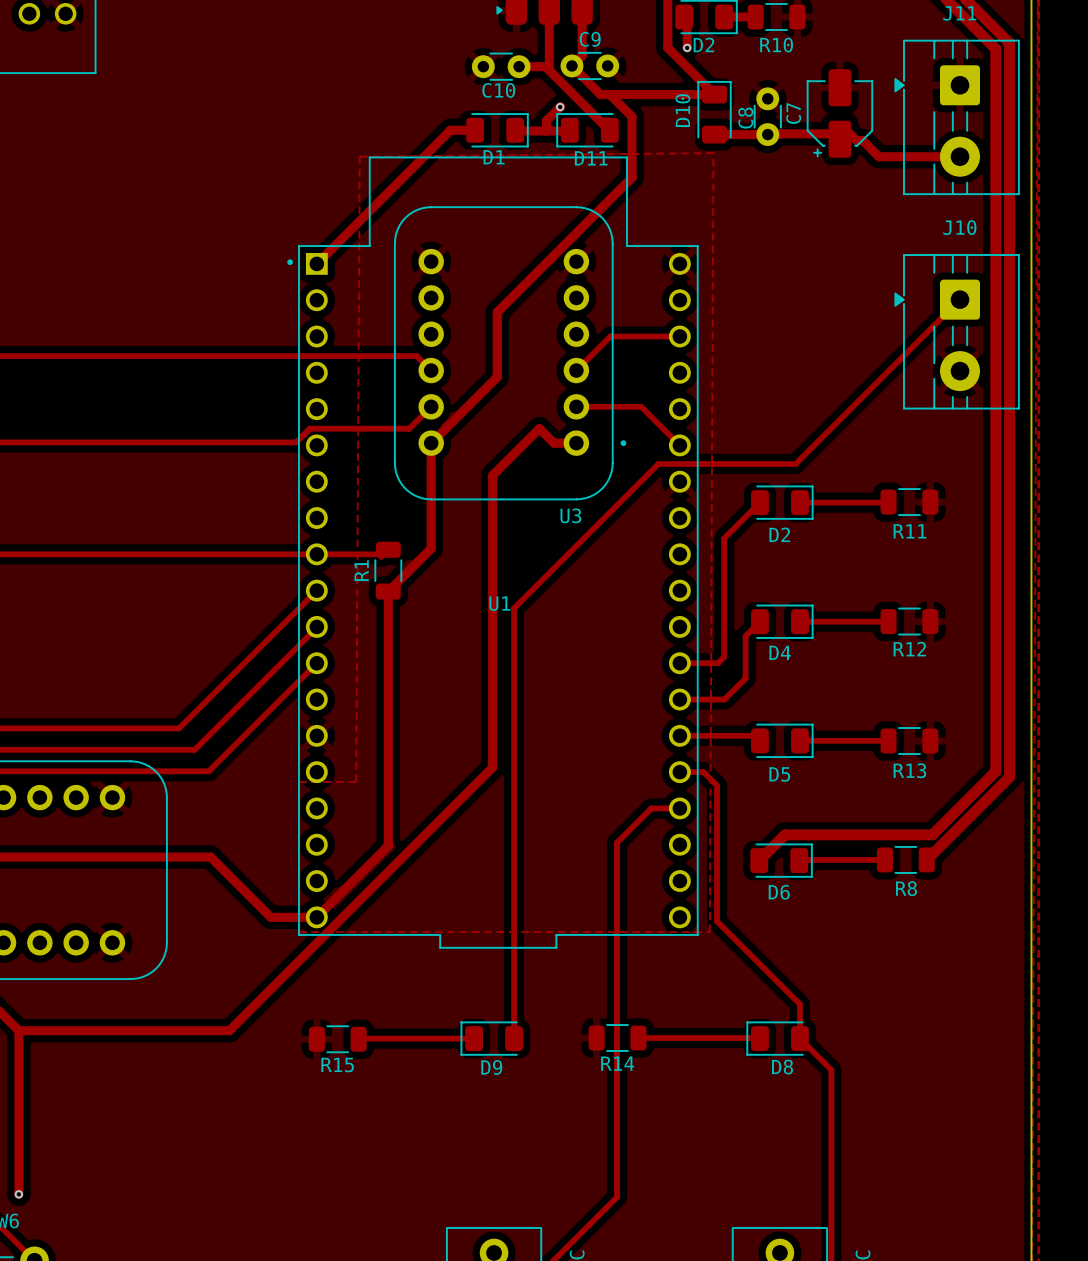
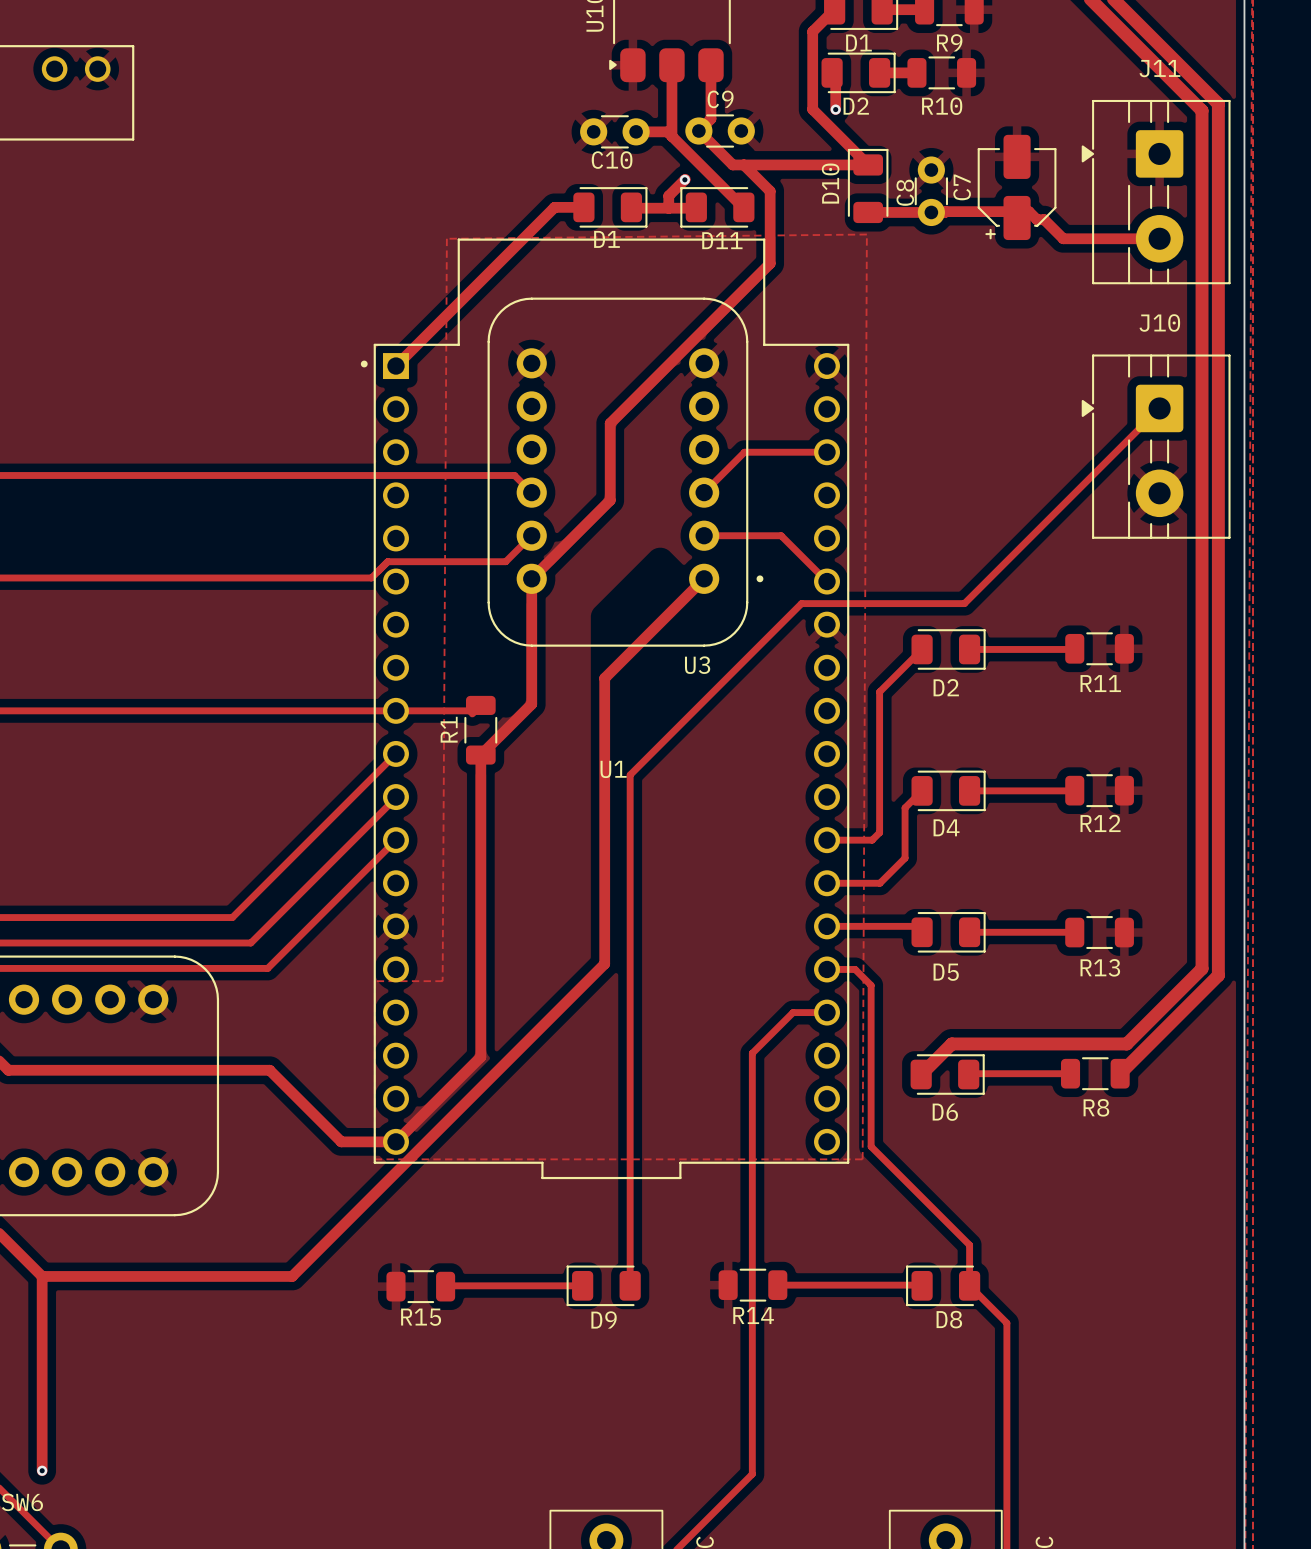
track: (576, 443) (553, 443) (539, 428) (492, 475) (492, 526) -> (704, 578) (604, 678)

